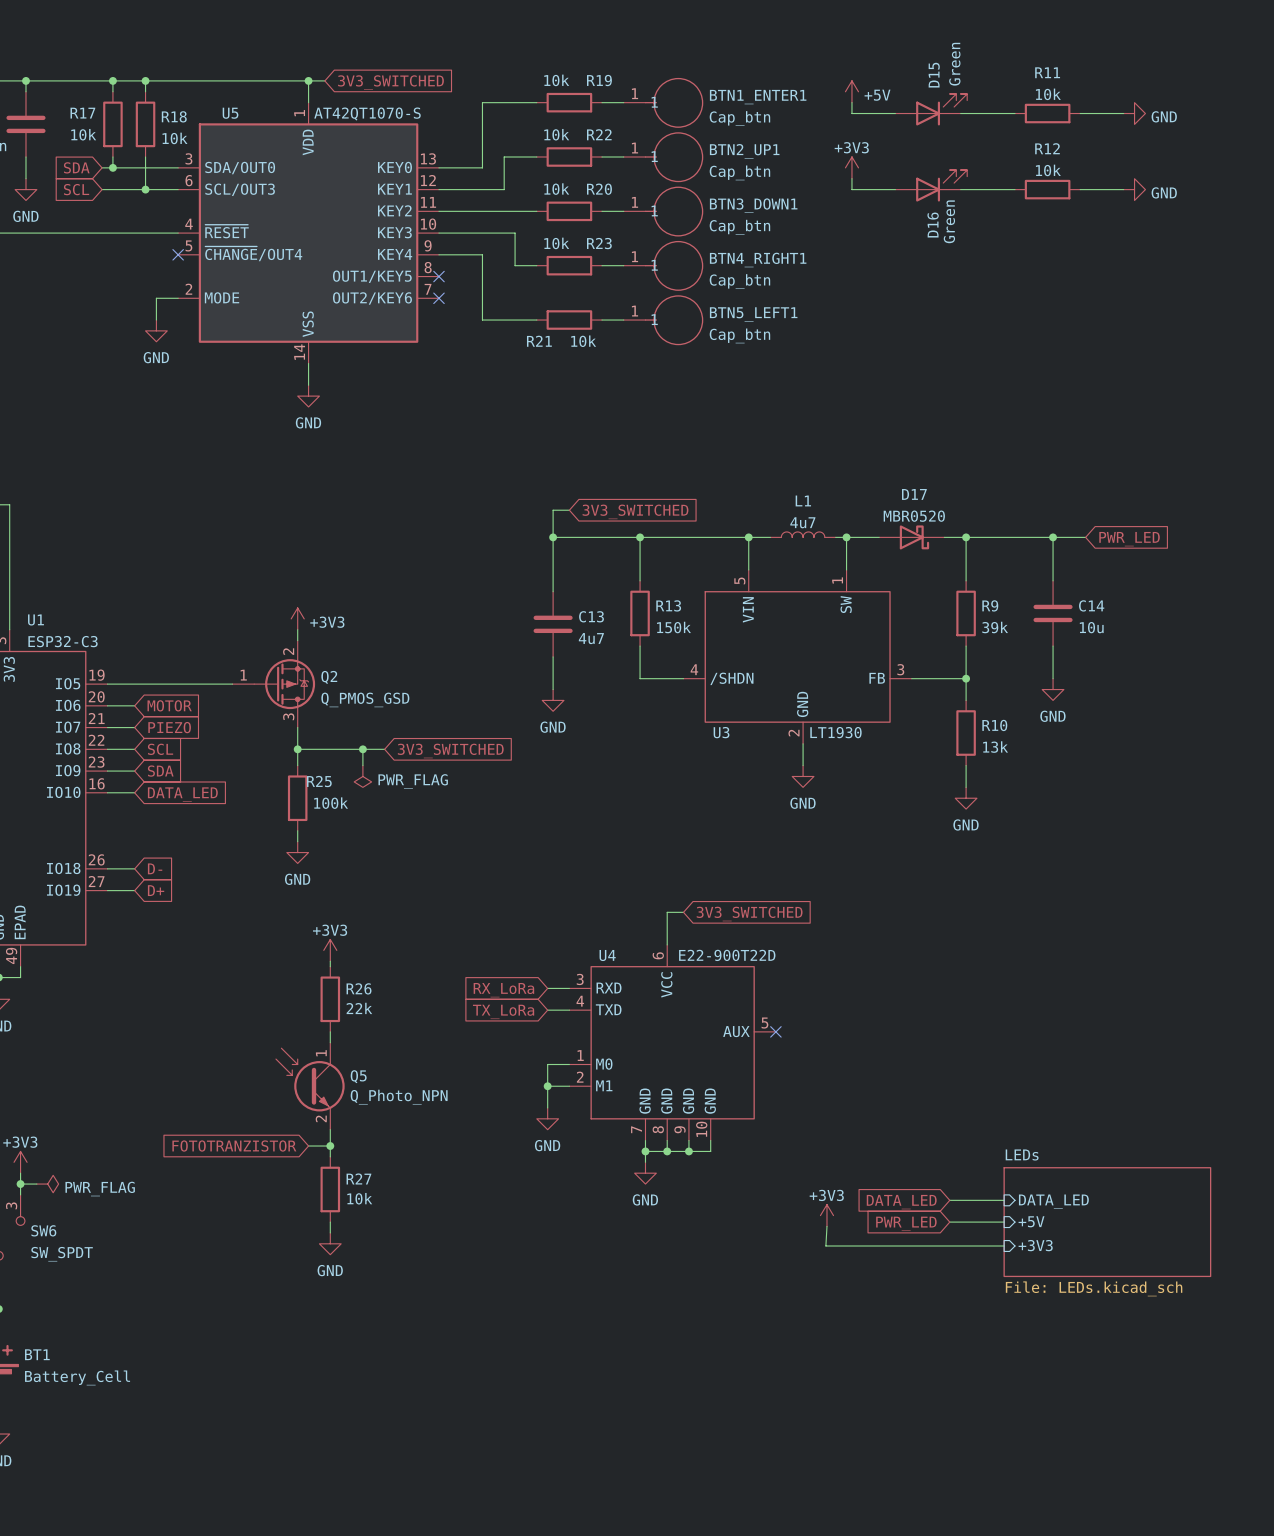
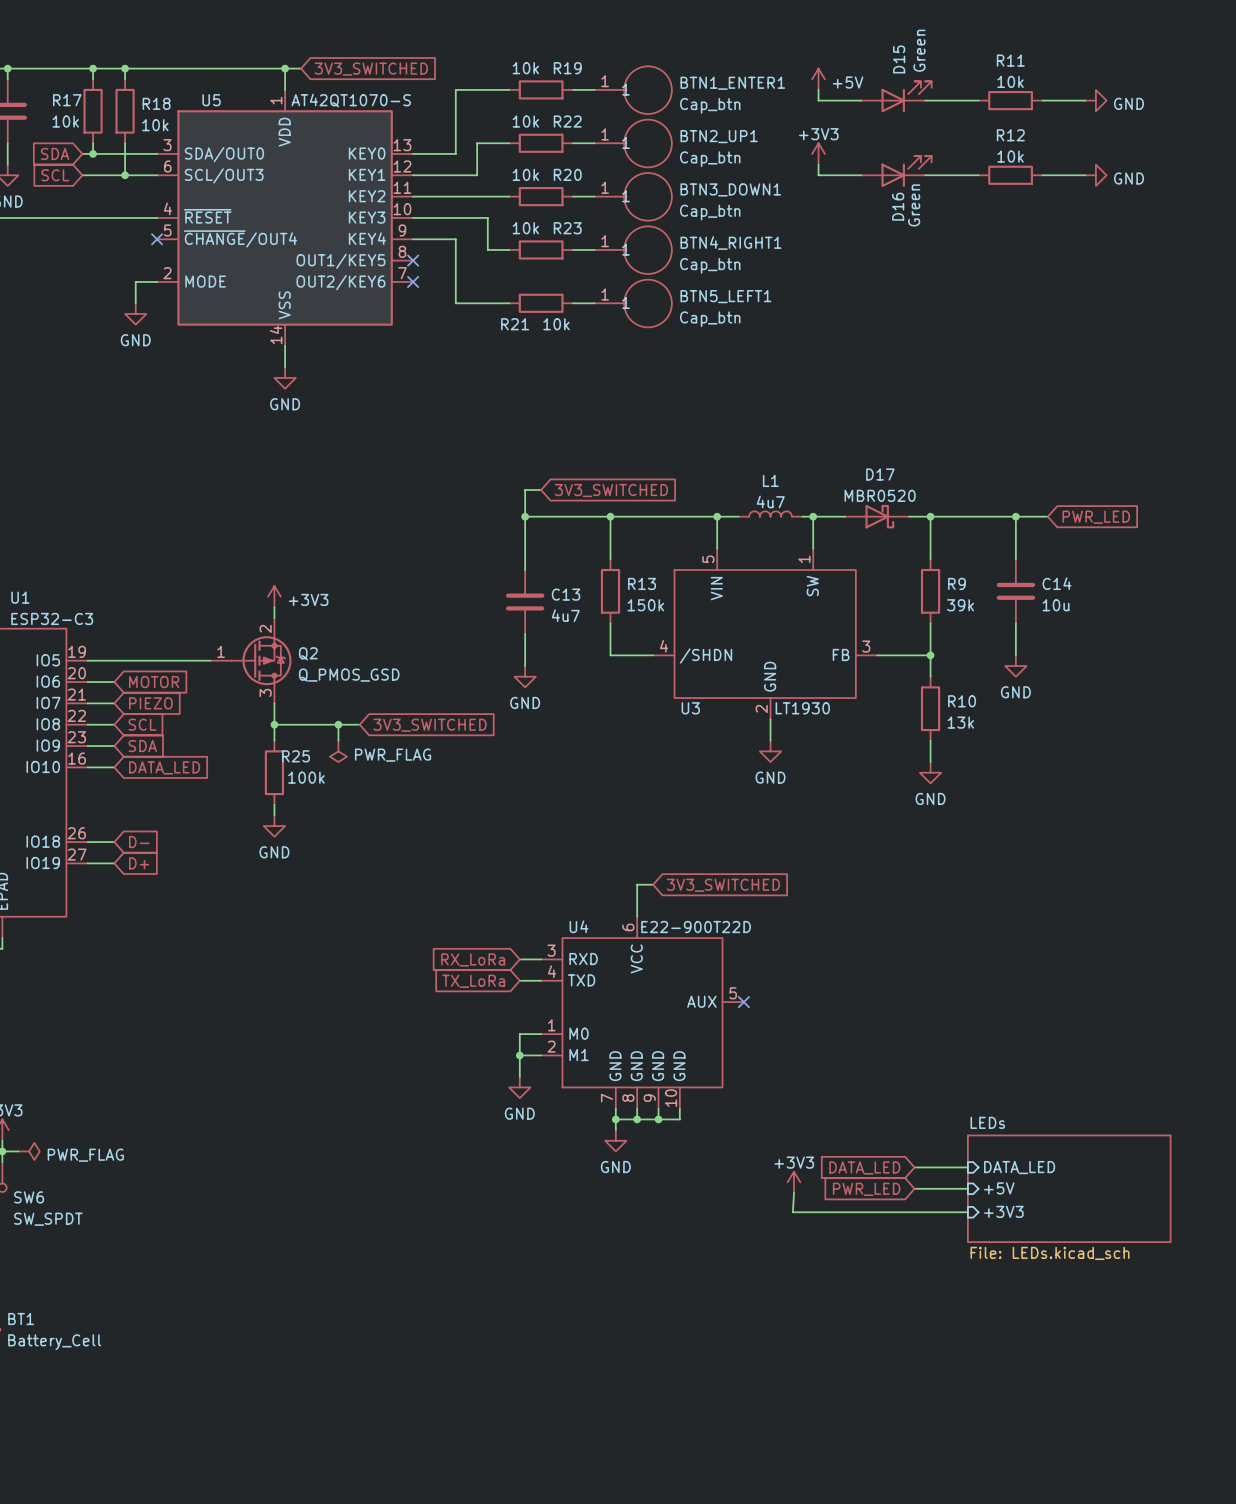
power symbol: +3V3 (330, 950) -> none
wire: (330, 961) (330, 966) -> none
R26: 22k (330, 999) -> none
wire: (330, 1031) (330, 1042) -> none
Q5: Q_Photo_NPN (310, 1086) -> none
wire: (330, 1129) (330, 1156) -> none
global label: FOTOTRANZISTOR (234, 1146) -> none
wire: (308, 1146) (330, 1146) -> none
junction: (330, 1146) -> none
R27: 10k (330, 1189) -> none
wire: (330, 1222) (330, 1232) -> none
power symbol: GND (330, 1243) -> none

